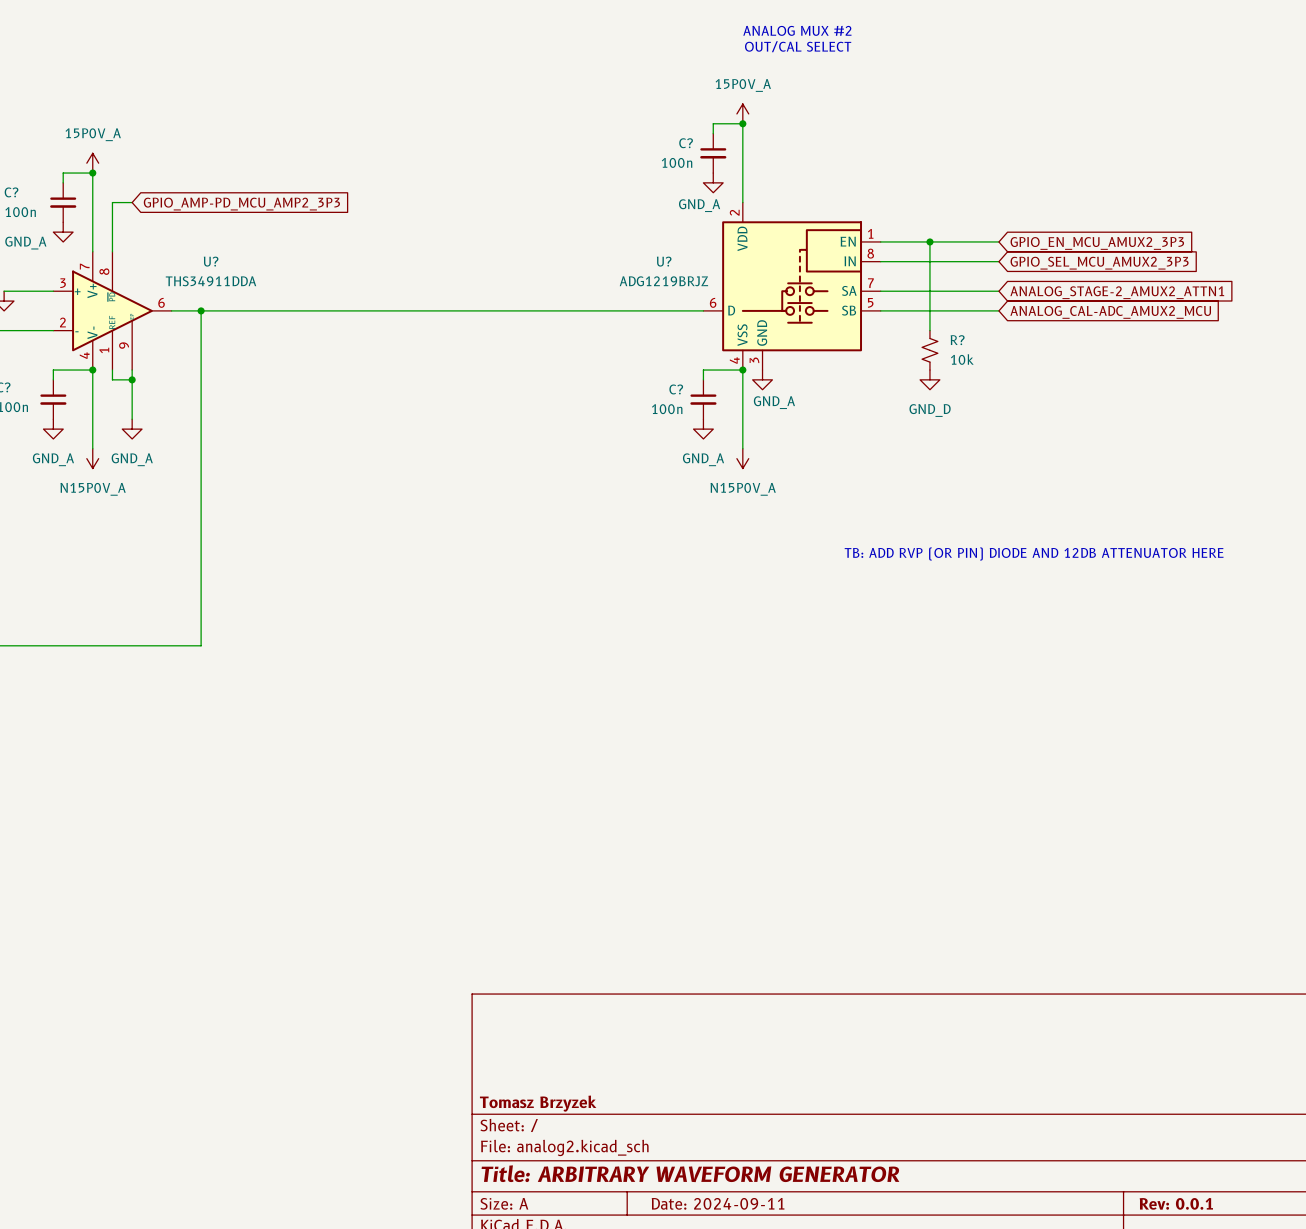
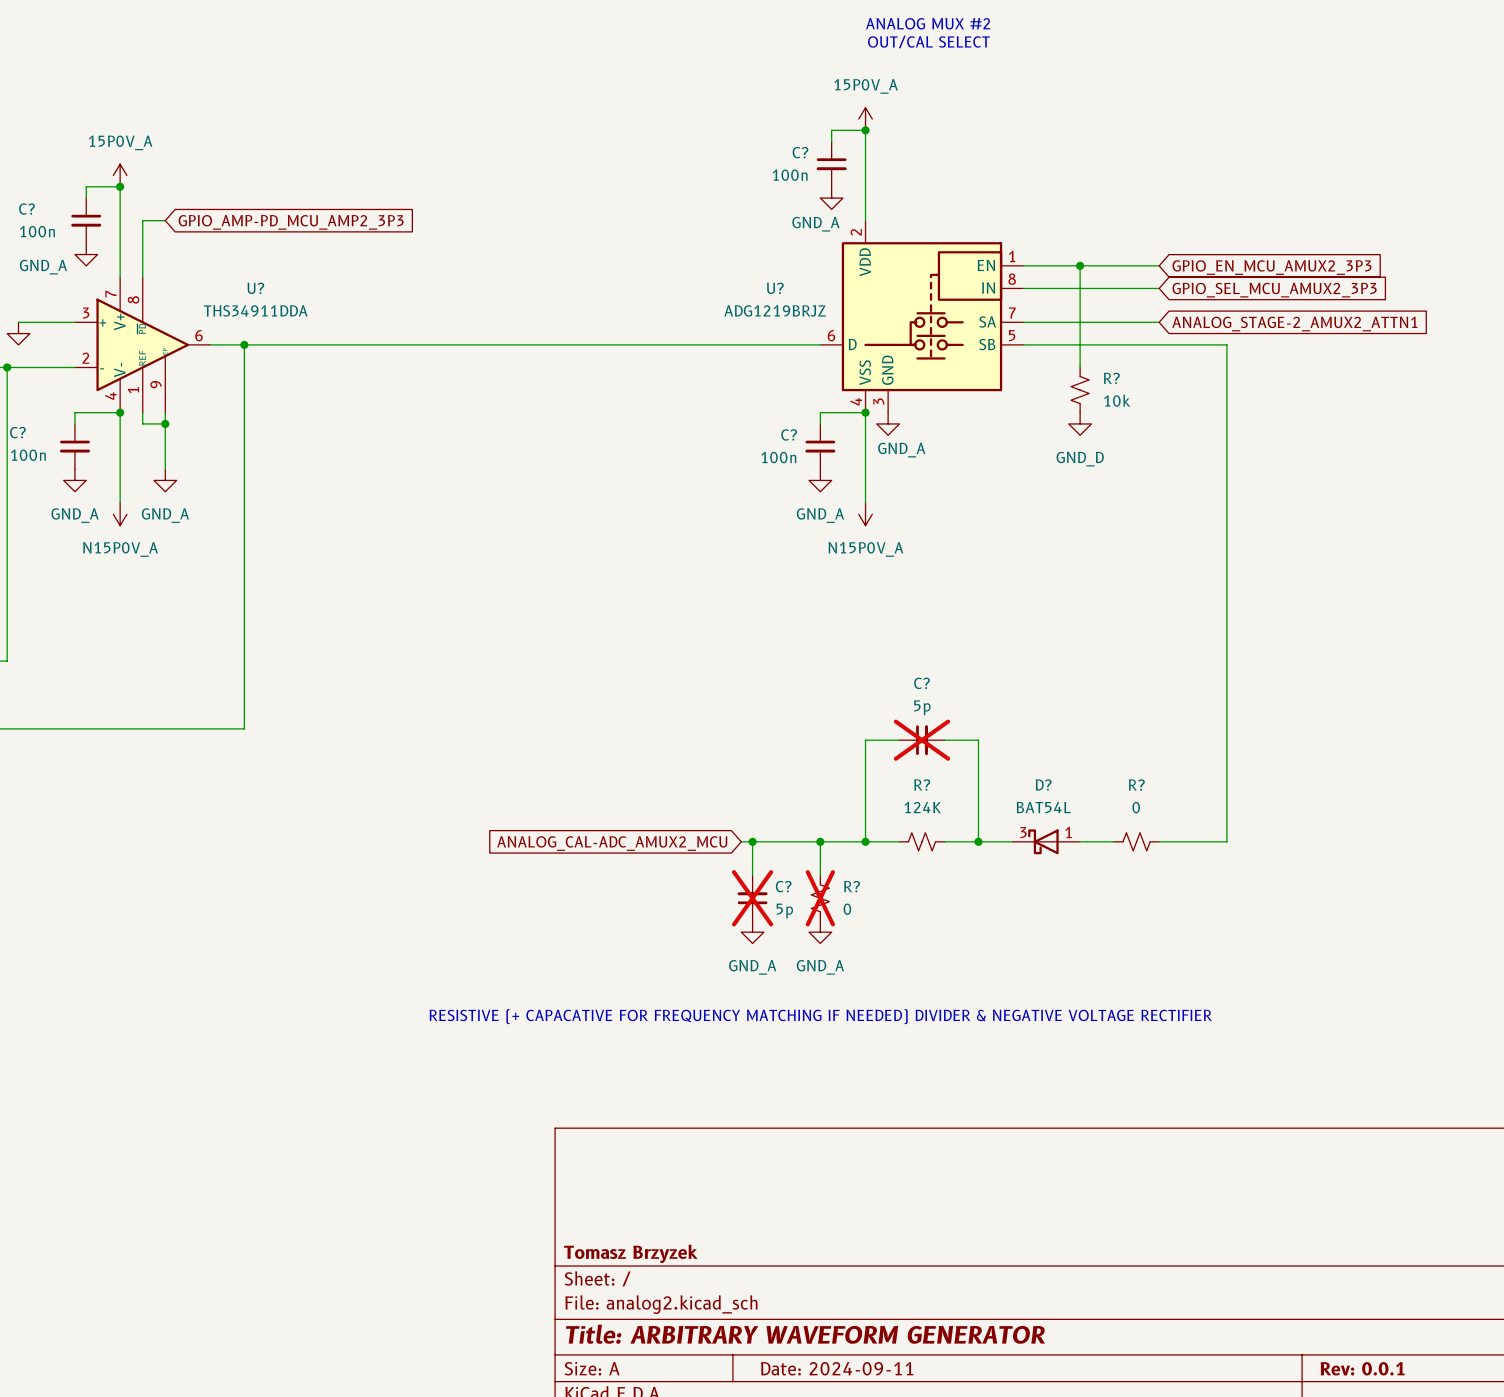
wire: none -> (1159, 344) (1226, 344) (1226, 841) (1159, 841)
global label: ANALOG_CAL-ADC_AMUX2_MCU (1110, 312) -> none
text: TB: ADD RVP (OR PIN) DIODE AND 12DB ATTENUATOR HERE (1034, 553) -> none
wire: none -> (899, 740) (865, 740) (865, 841)
C?: none -> 5p (921, 740)
wire: none -> (944, 740) (978, 740) (978, 841)
wire: none -> (741, 841) (899, 841)
wire: none -> (752, 841) (752, 875)
junction: none -> (752, 841)
wire: none -> (820, 841) (820, 875)
junction: none -> (820, 841)
junction: none -> (865, 841)
R?: none -> 124K (921, 841)
wire: none -> (944, 841) (1012, 841)
junction: none -> (978, 841)
D?: none -> BAT54L (1046, 841)
wire: none -> (1080, 841) (1113, 841)
R?: none -> 0 (1136, 841)
global label: none -> ANALOG_CAL-ADC_AMUX2_MCU (612, 843)
C?: none -> 5p (752, 898)
R?: none -> 0 (820, 898)
power symbol: none -> GND_A (752, 932)
power symbol: none -> GND_A (820, 932)
text: none -> RESISTIVE (+ CAPACATIVE FOR FREQUENCY MATCHING IF NEEDED) DIVIDER & NEGATIVE VOLTAGE RECTIFIER (820, 1016)

